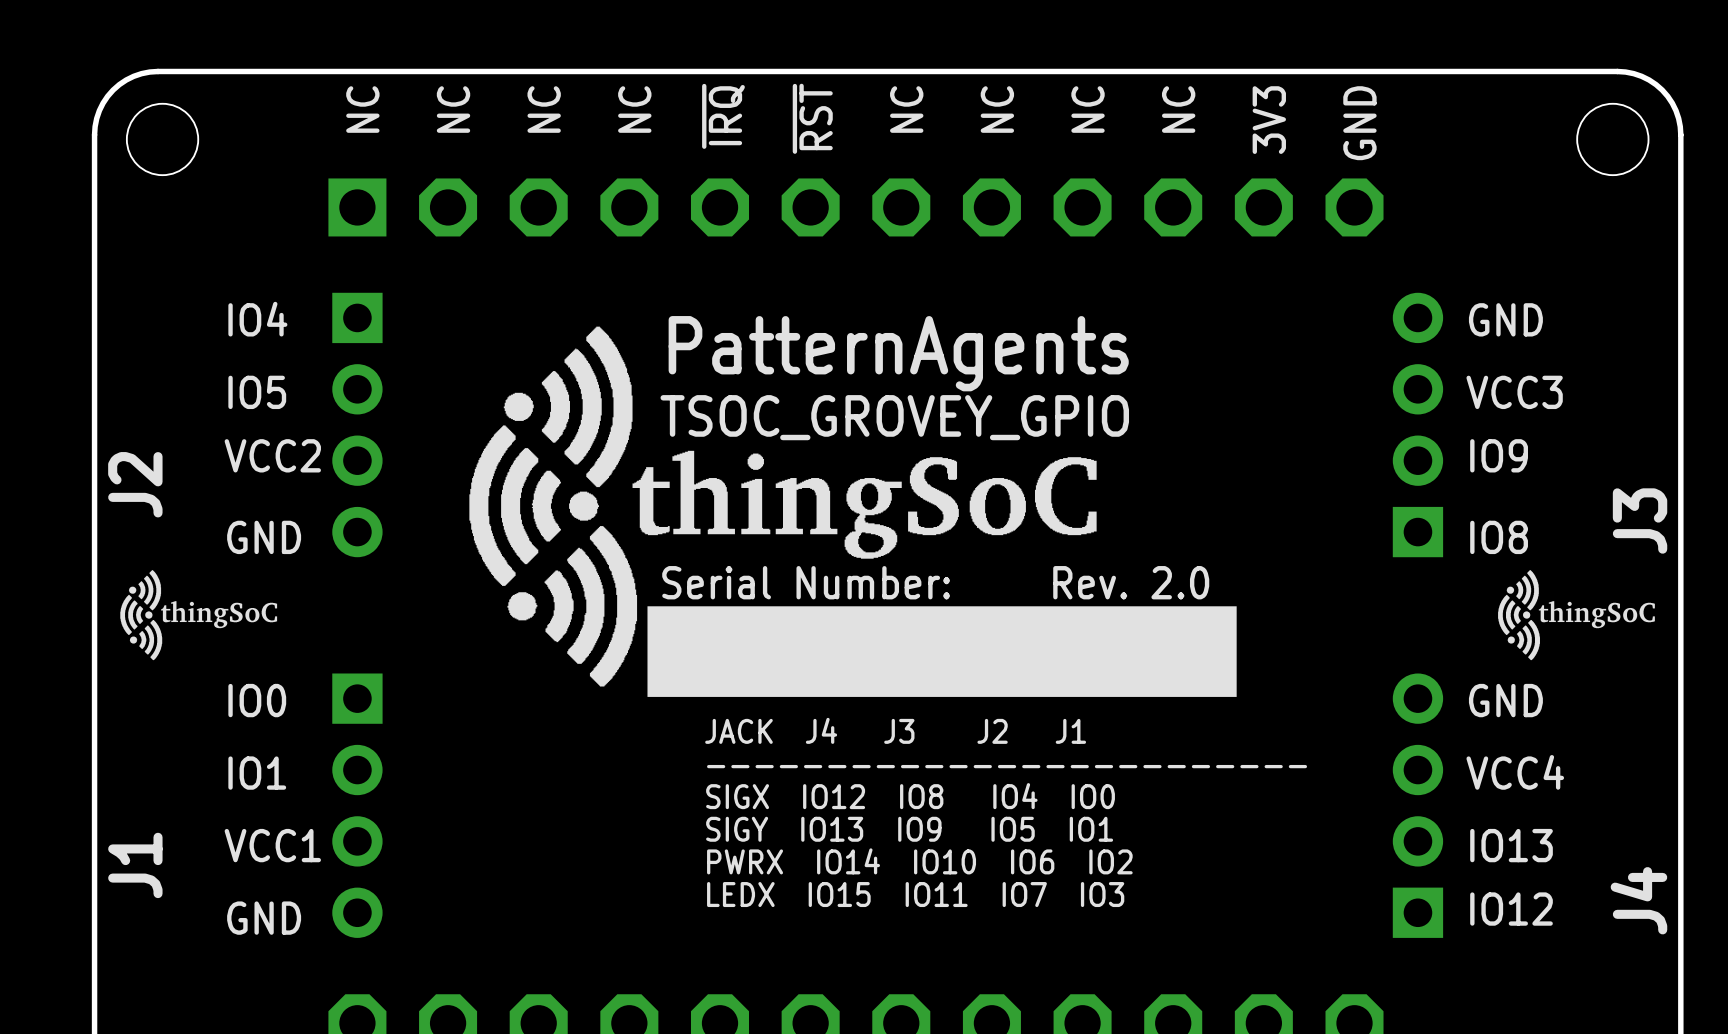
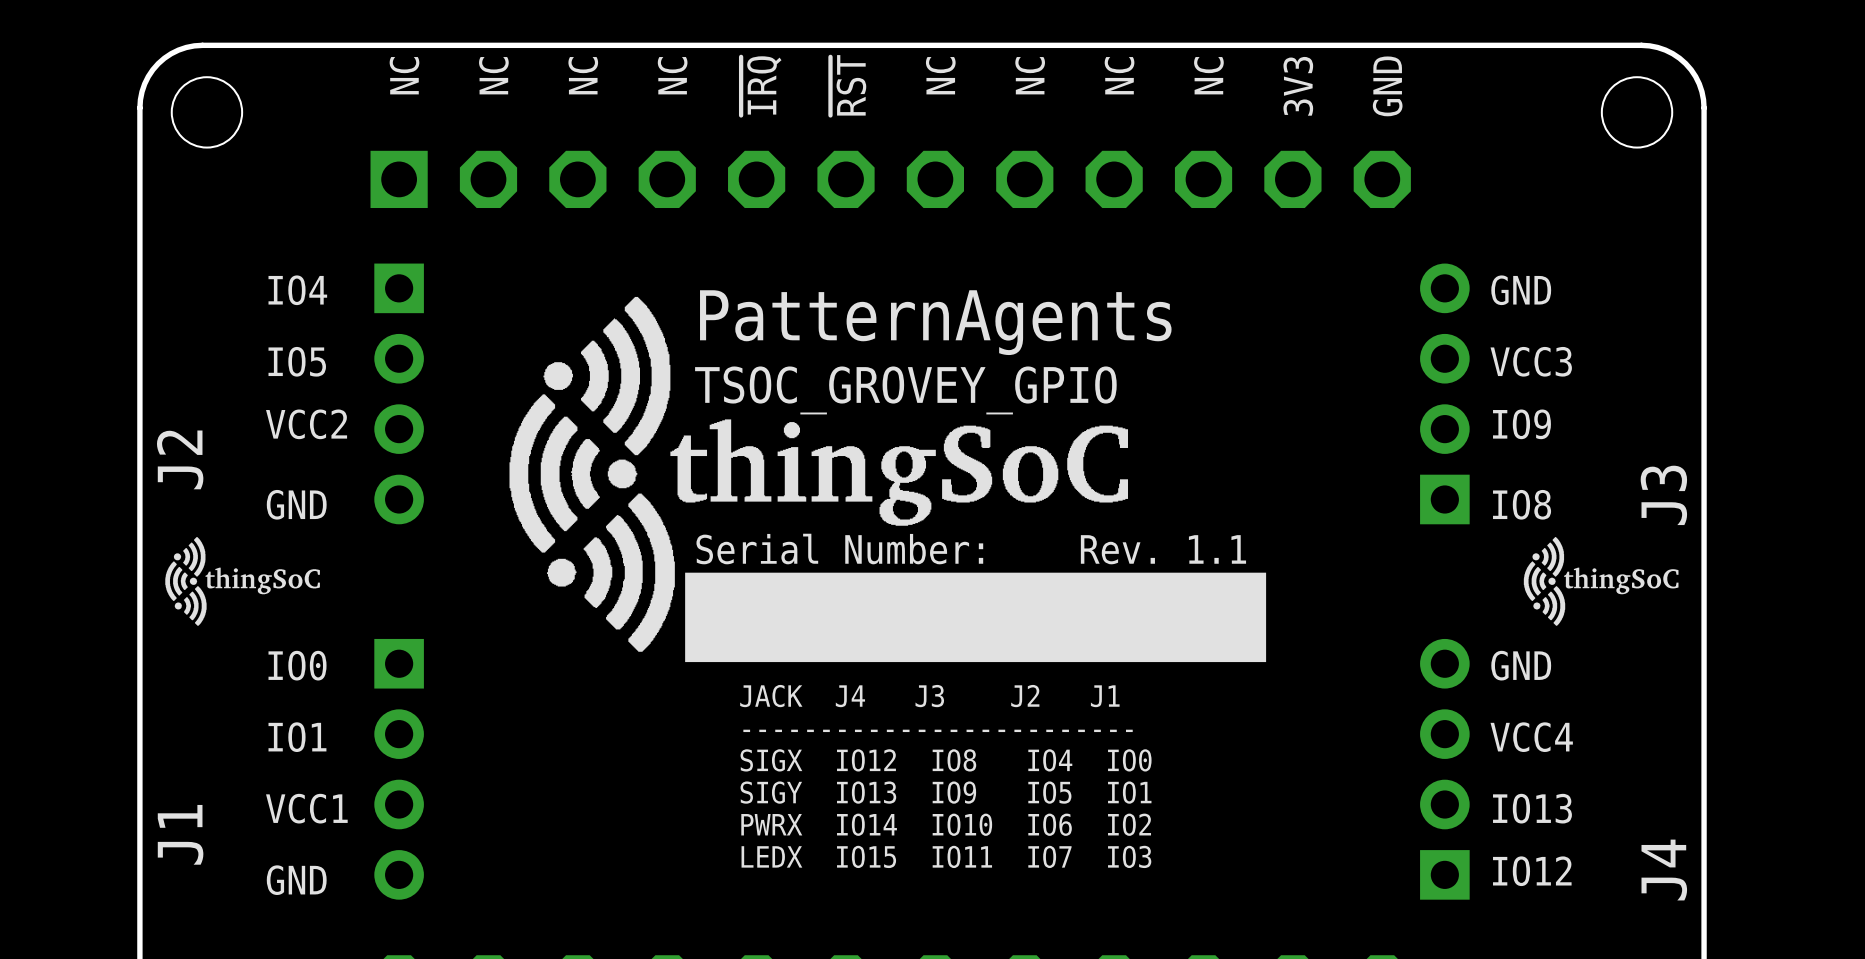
text: Rev. 2.0 (1131, 582) -> Rev. 1.1 (1163, 549)

